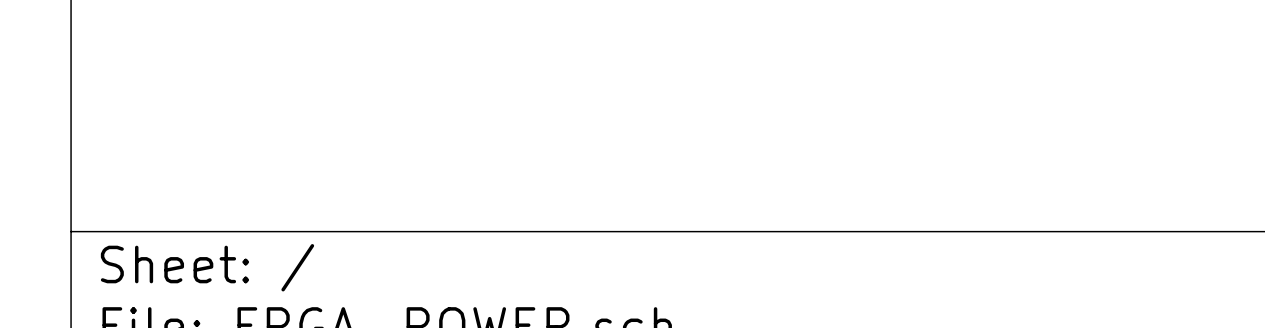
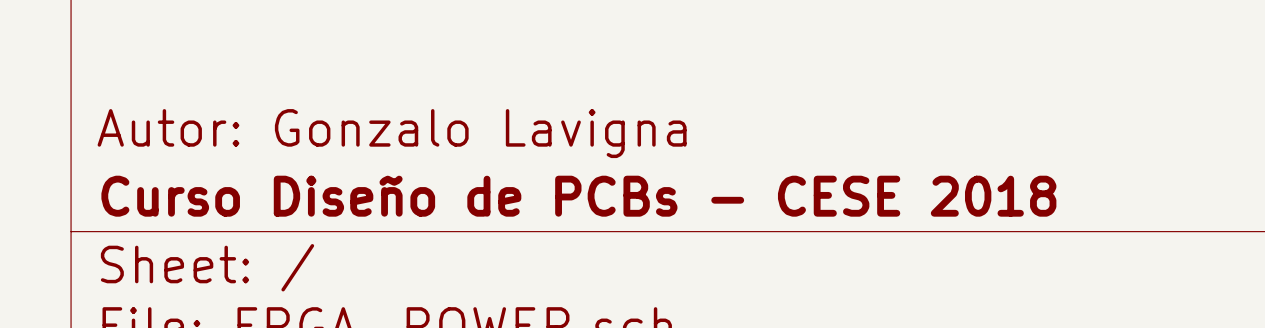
title block: none -> Autor: Gonzalo Lavigna (392, 133)
title block: none -> Curso Diseño de PCBs - CESE 2018 (578, 196)

